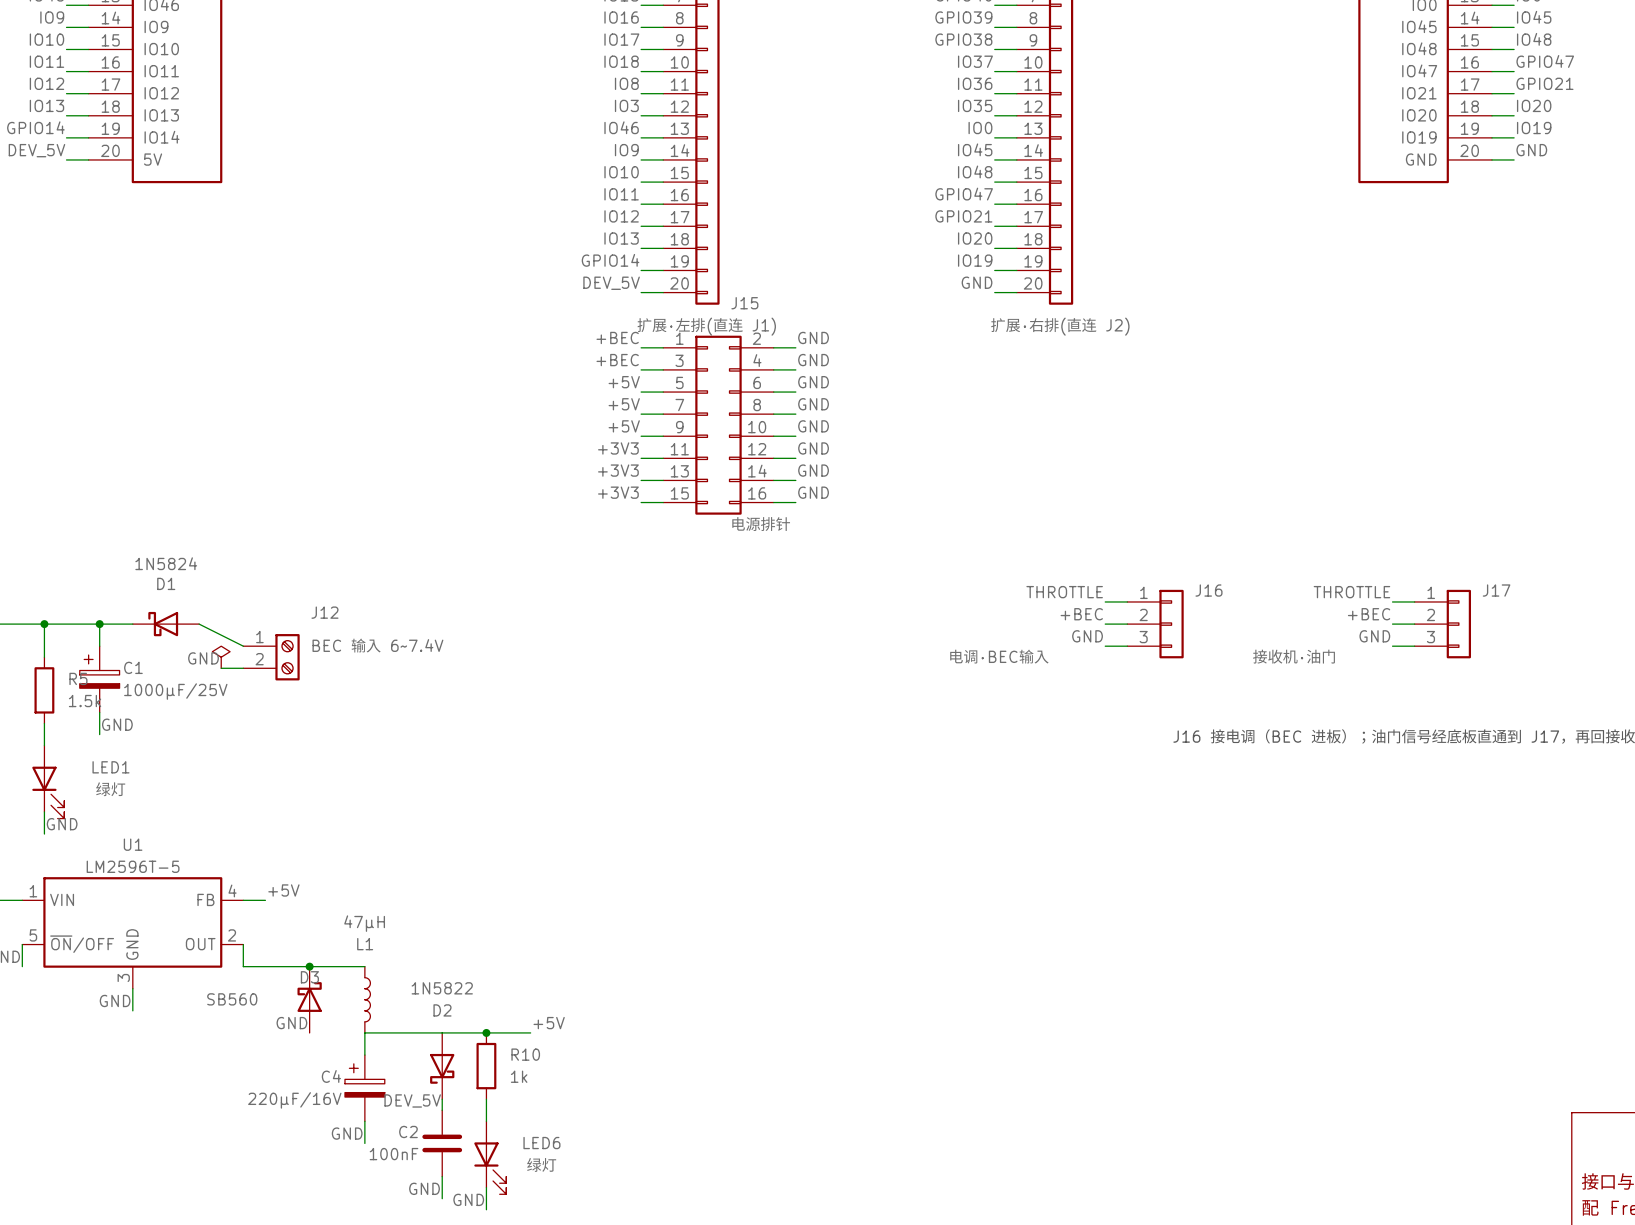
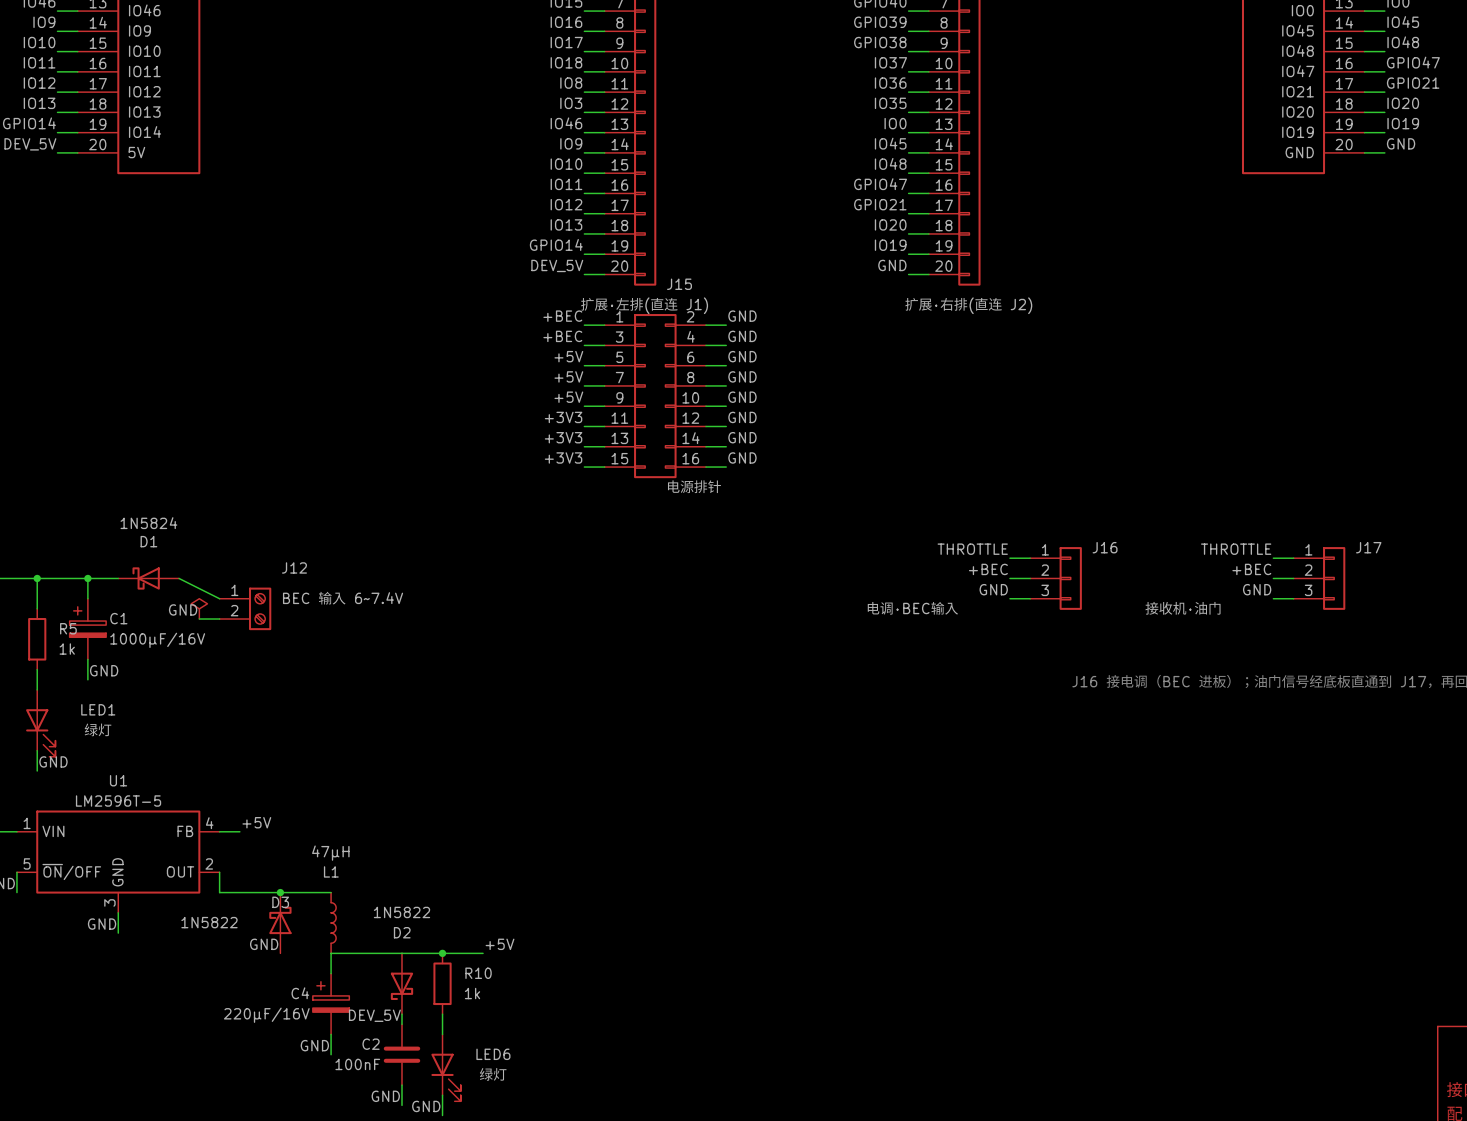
C1 value: 1000µF/25V (175, 691) -> 1000µF/16V (157, 640)
R5 value: 1.5k (85, 701) -> 1k (67, 649)
D3 value: SB560 (232, 999) -> 1N5822 (209, 922)

